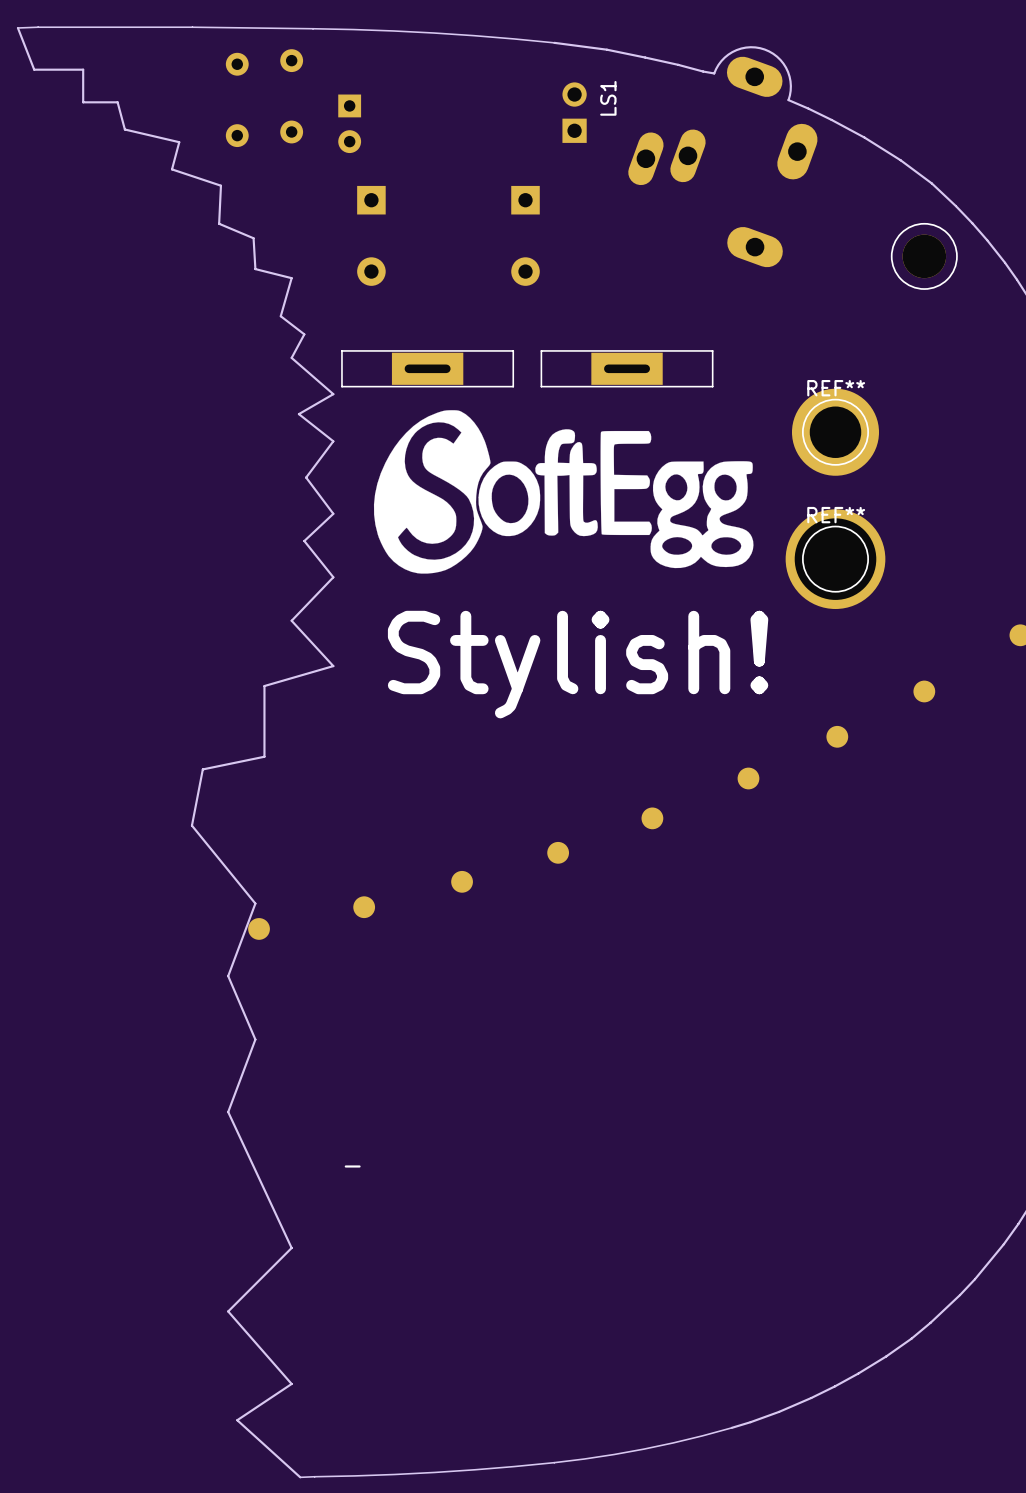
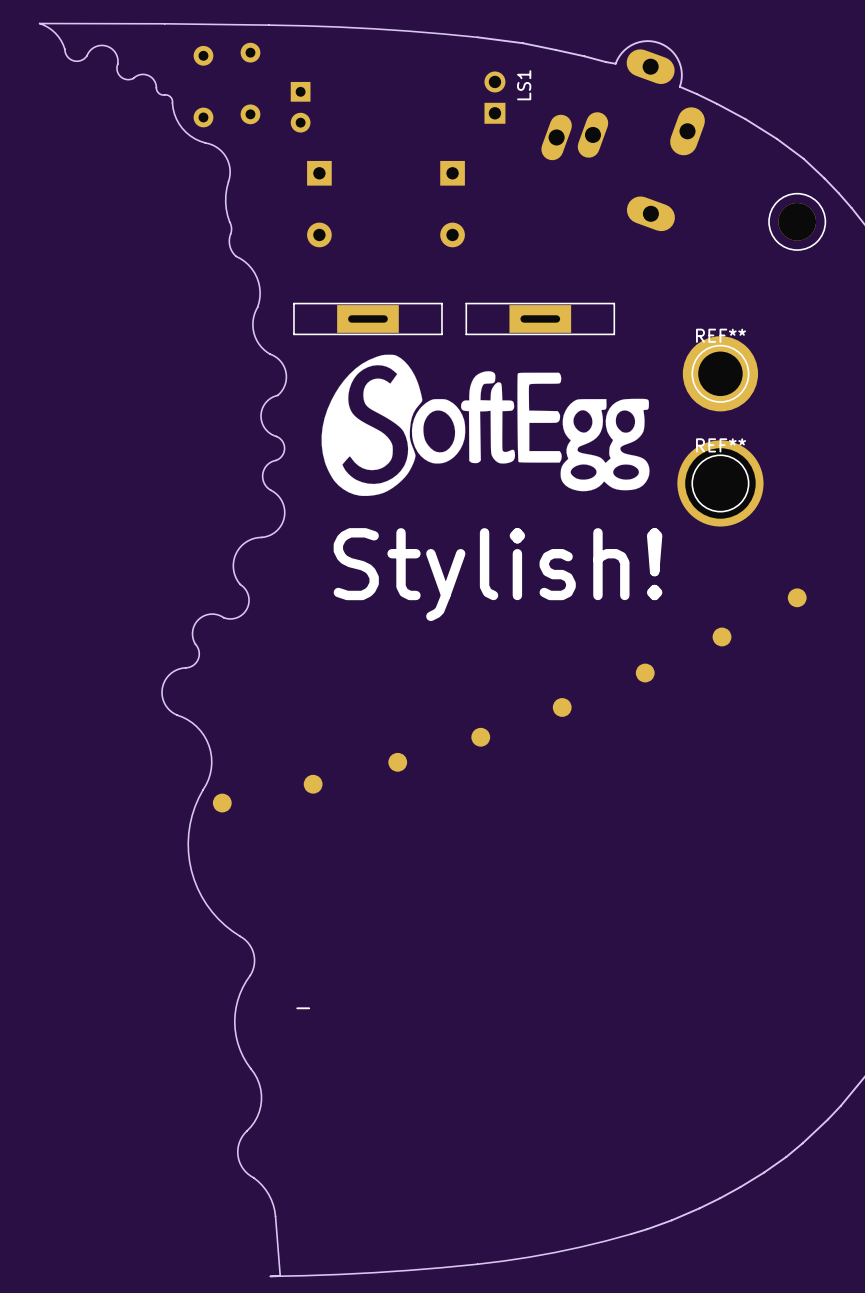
board edge: (192, 27) (17, 27) (34, 69) (83, 69) (83, 102) (117, 102) (124, 129) (179, 142) (172, 169) (220, 185) (219, 223) (253, 238) (255, 269) (291, 278) (280, 316) (304, 334) (291, 357) (333, 394) (298, 414) (333, 441) (306, 477) (333, 513) (304, 541) (333, 577) (291, 620) (333, 666) (264, 686) (264, 756) (202, 769) (191, 825) (255, 903) (228, 976) (255, 1039) (228, 1112) (291, 1248) (228, 1311) (291, 1383) (237, 1420) (300, 1477) (314, 1476) -> (164, 94) (171, 98) (176, 118) (186, 132) (194, 138) (215, 146) (227, 160) (230, 174) (225, 202) (231, 227) (229, 246) (234, 254) (251, 268) (258, 282) (259, 297) (252, 321) (255, 336) (263, 349) (281, 362) (286, 375) (283, 388) (277, 395) (266, 401) (261, 415) (265, 429) (280, 438) (284, 445) (282, 455) (267, 464) (262, 475) (266, 486) (282, 501) (284, 510) (283, 520) (273, 533) (248, 540) (235, 553) (233, 564) (234, 575) (246, 591) (248, 597) (245, 610) (234, 618) (228, 618) (212, 614) (198, 619) (192, 632) (193, 639) (199, 652) (197, 660) (190, 666) (171, 672) (164, 682) (162, 691) (163, 699) (167, 707) (196, 726) (204, 735) (210, 751) (210, 774) (195, 806) (188, 833) (189, 861) (194, 879) (201, 896) (212, 912) (225, 925) (247, 942) (254, 956) (253, 969) (237, 1000) (234, 1021) (237, 1043) (243, 1056) (257, 1078) (261, 1100) (257, 1117) (240, 1139) (237, 1152) (243, 1168) (262, 1185) (273, 1205) (280, 1276) (270, 1276)
board edge: none -> (164, 23) (39, 23) (48, 27) (58, 36) (66, 55) (70, 59) (81, 60) (94, 47) (108, 46) (116, 54) (117, 70) (120, 76) (128, 79) (140, 74) (148, 75) (154, 81) (158, 92) (164, 95)

